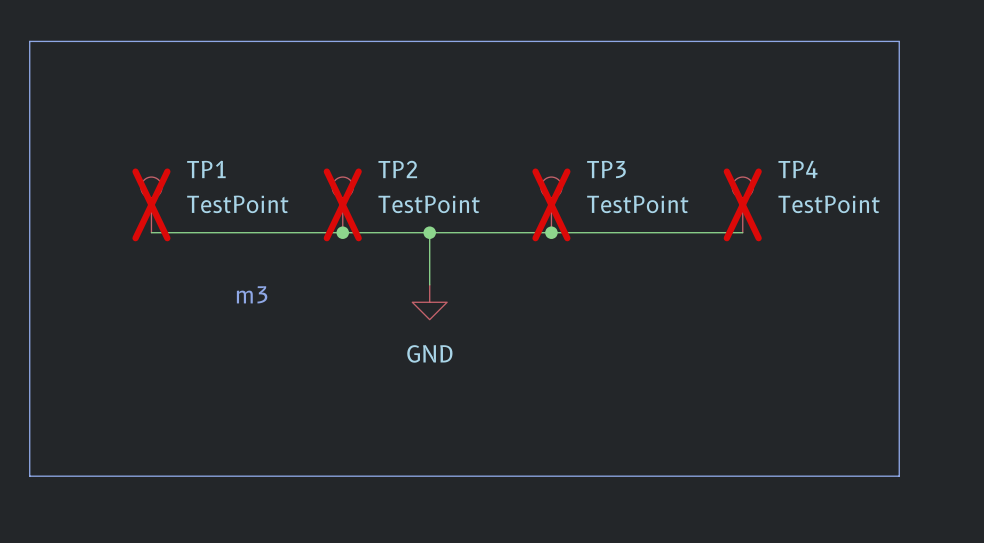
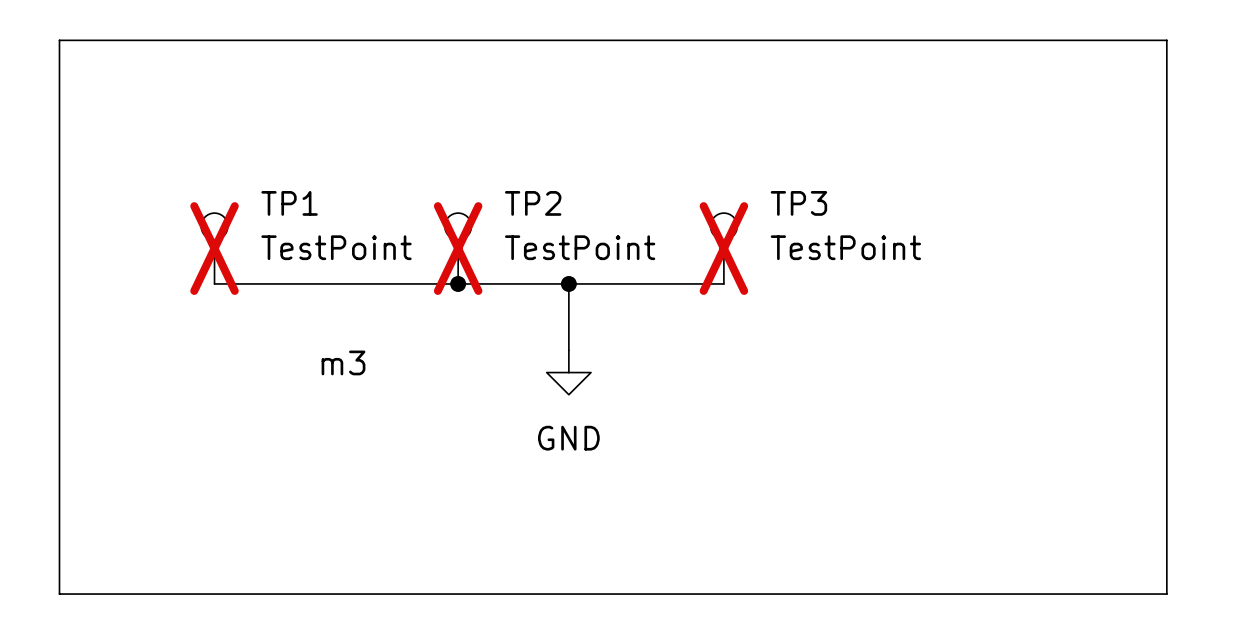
TP4: TestPoint (742, 204) -> none
wire: (551, 232) (742, 232) -> none
junction: (551, 232) -> none

